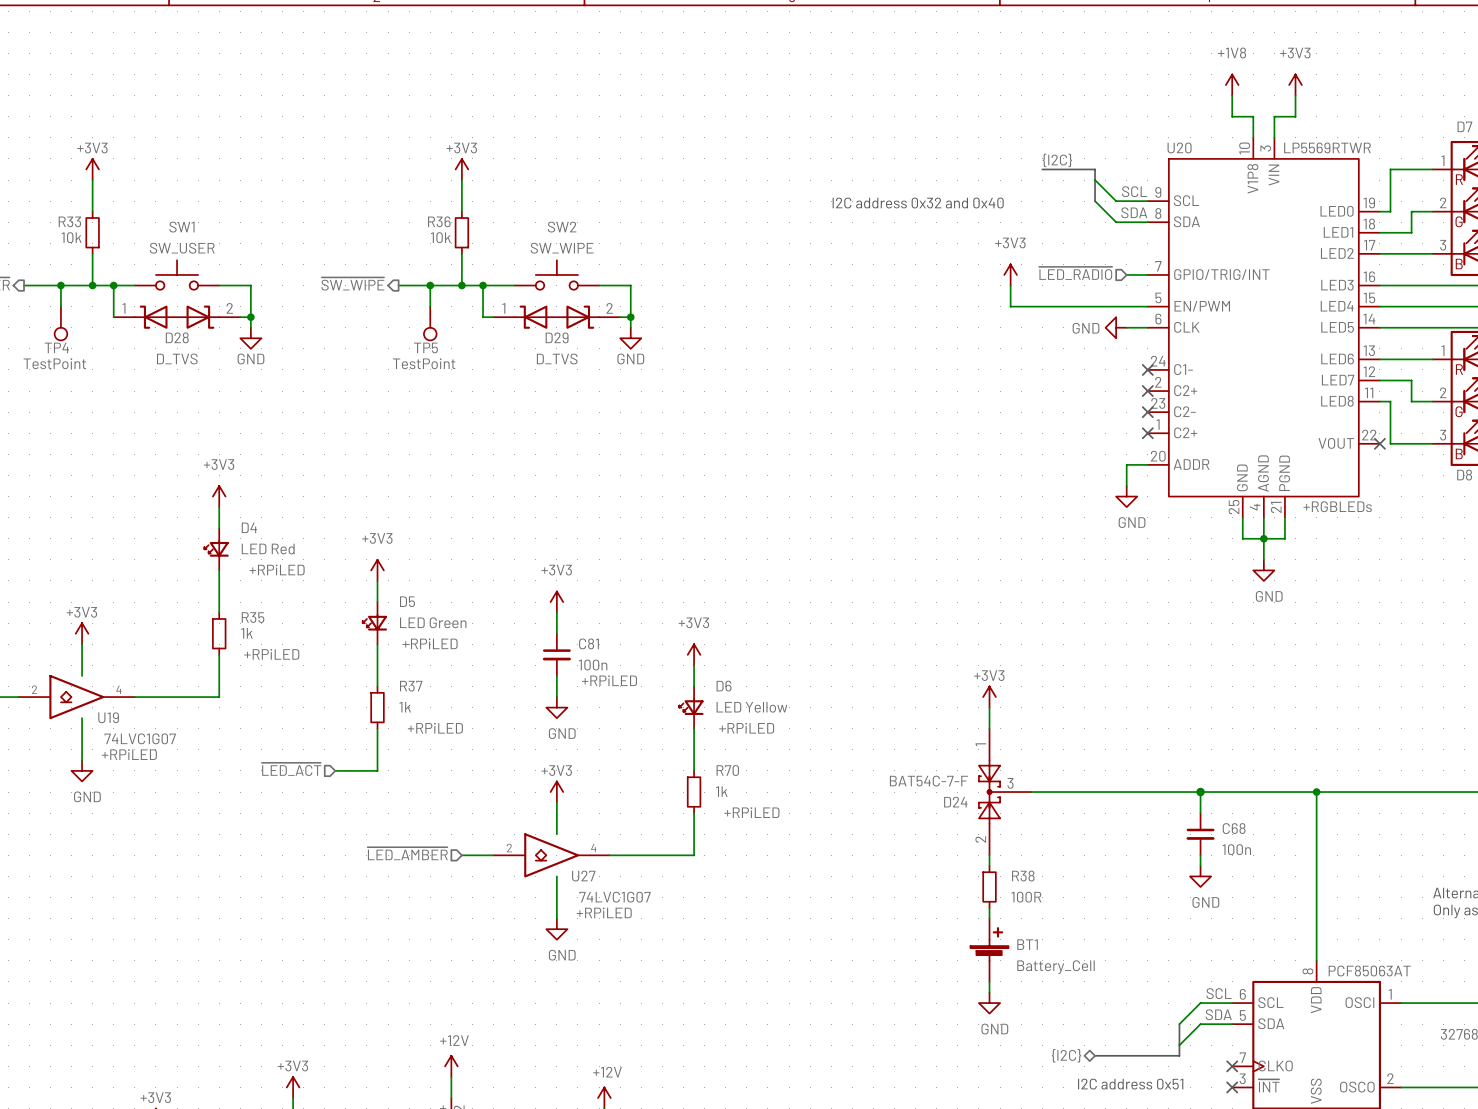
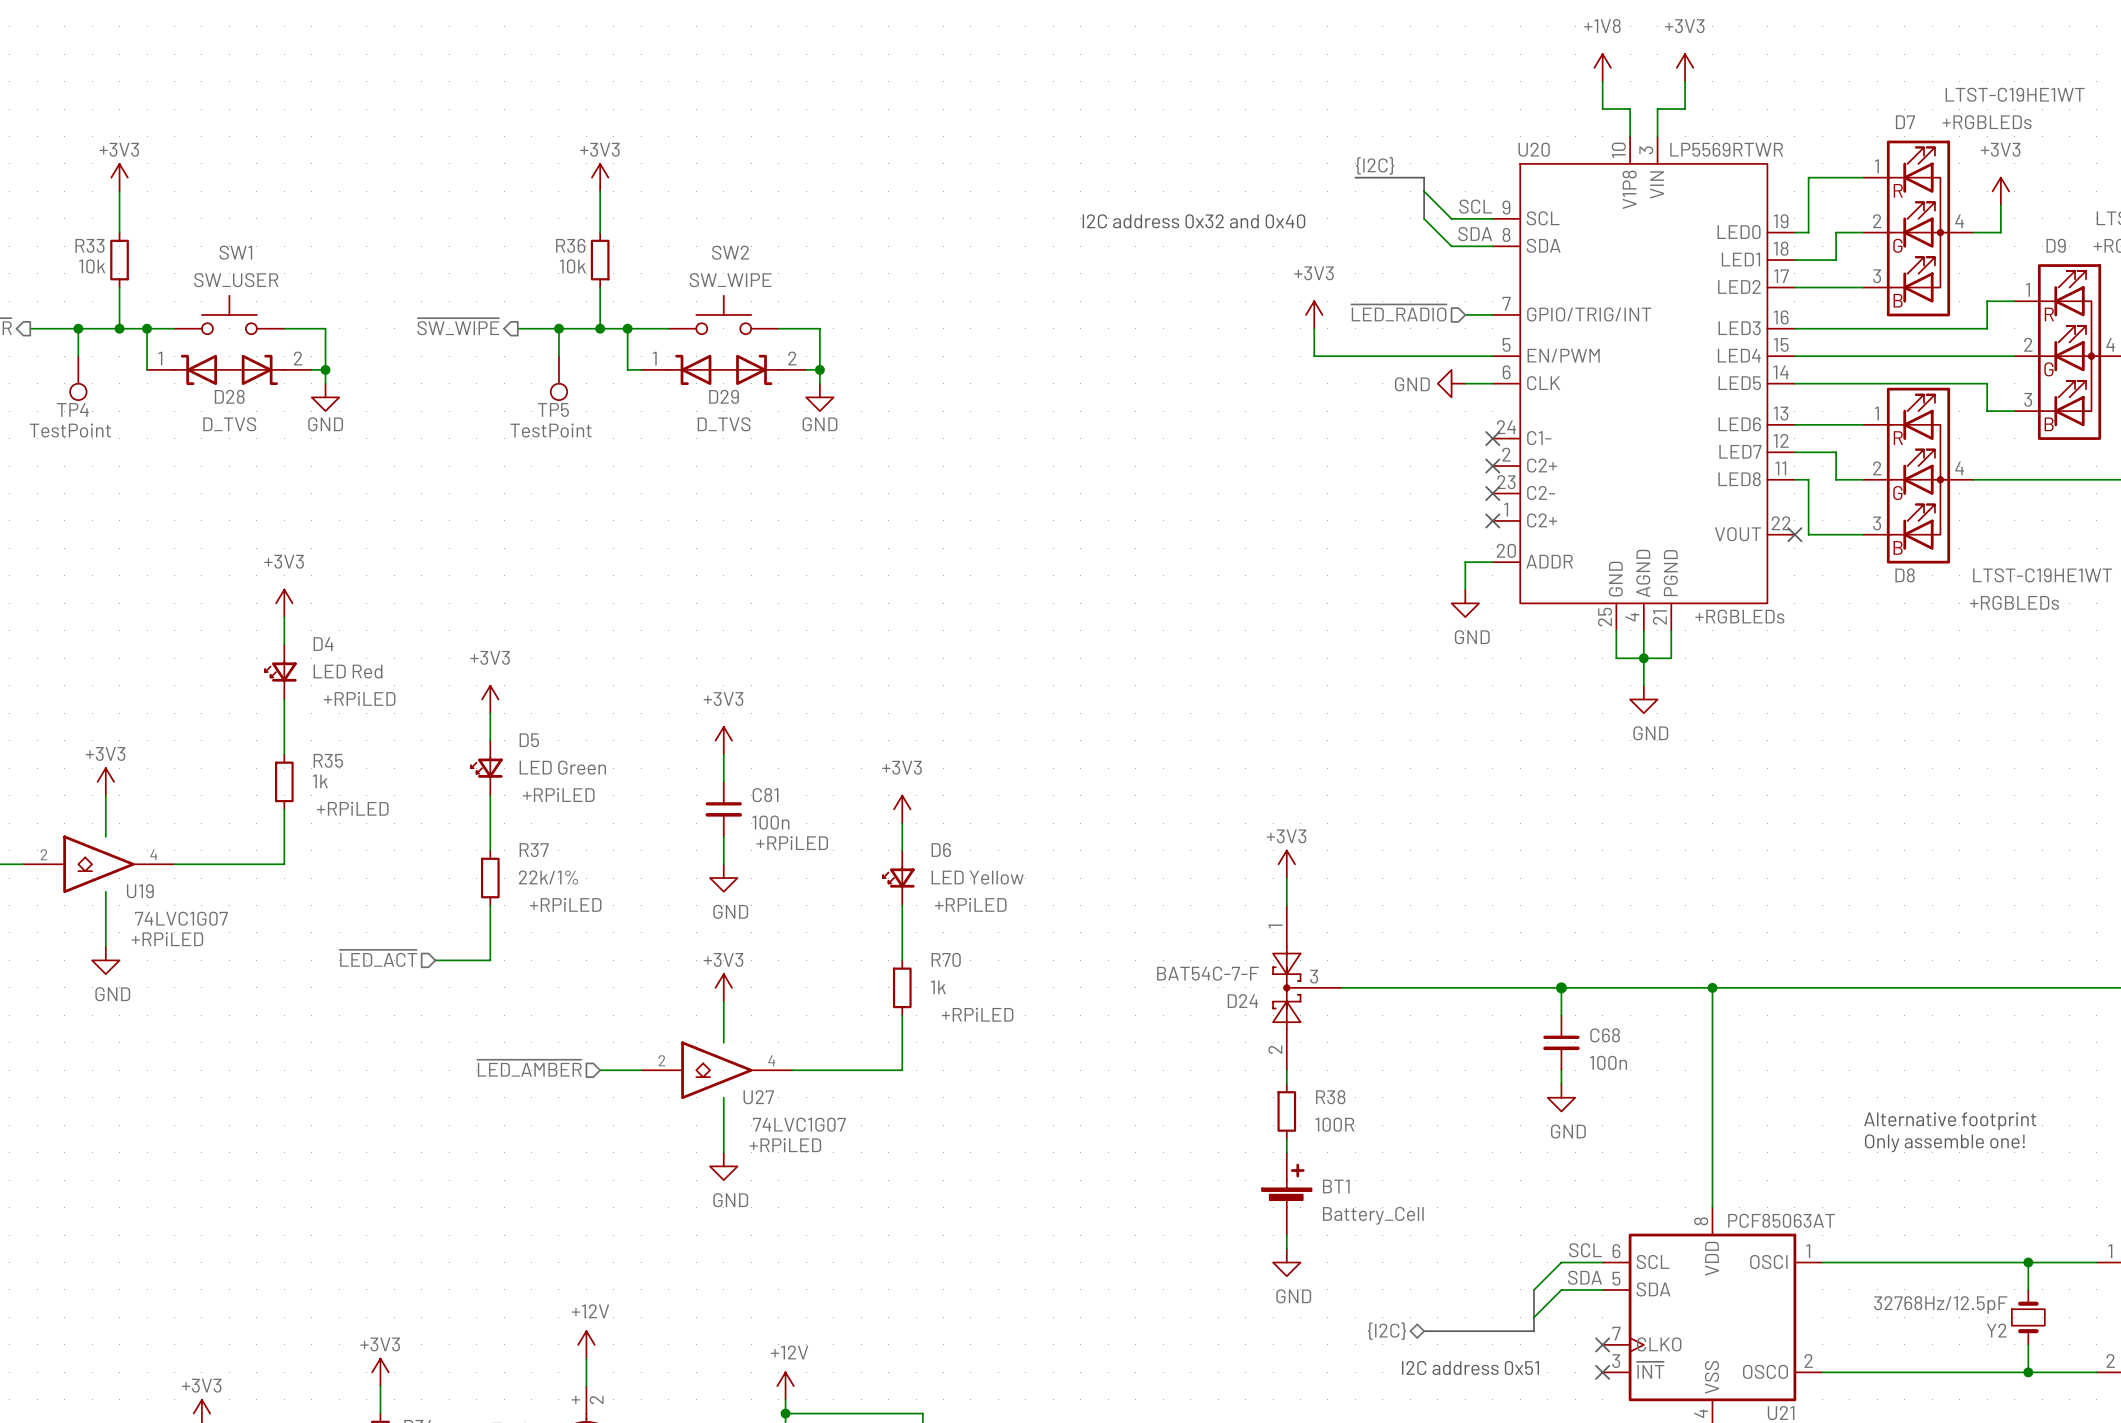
R37 value: 1k (405, 707) -> 22k/1% (548, 877)

